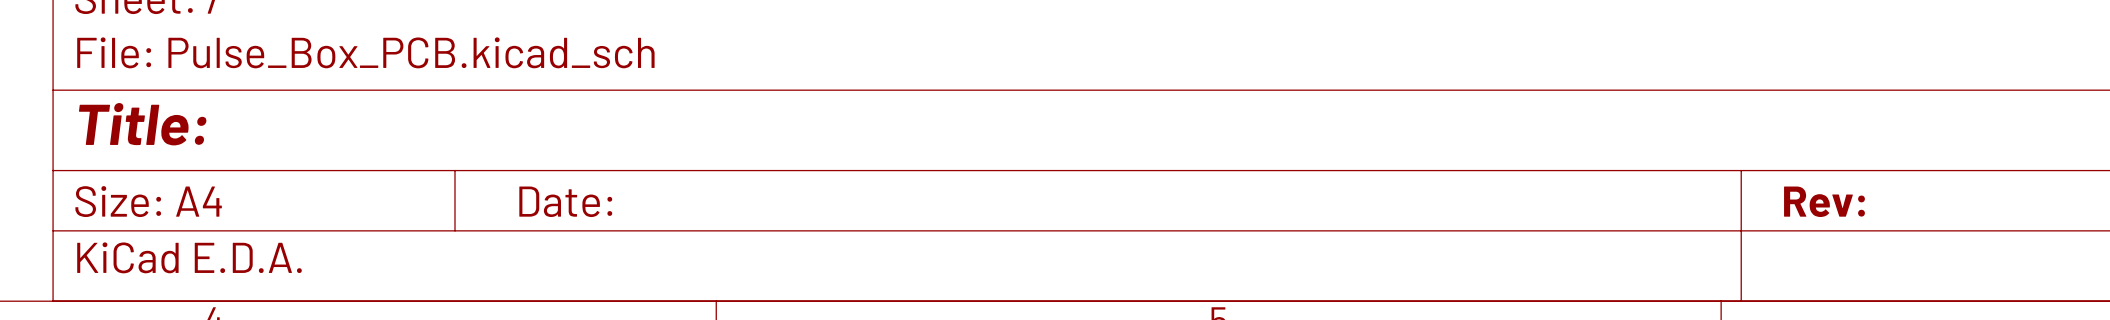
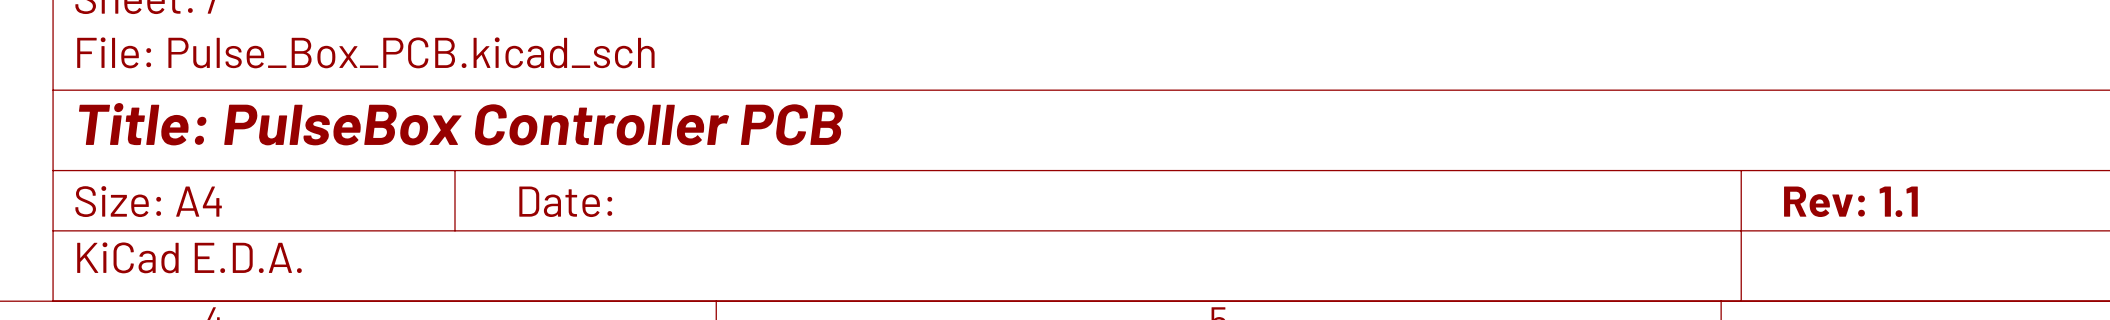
title block: Title: (142, 124) -> Title: PulseBox Controller PCB (461, 124)
title block: Rev: (1824, 201) -> Rev: 1.1 (1850, 201)

